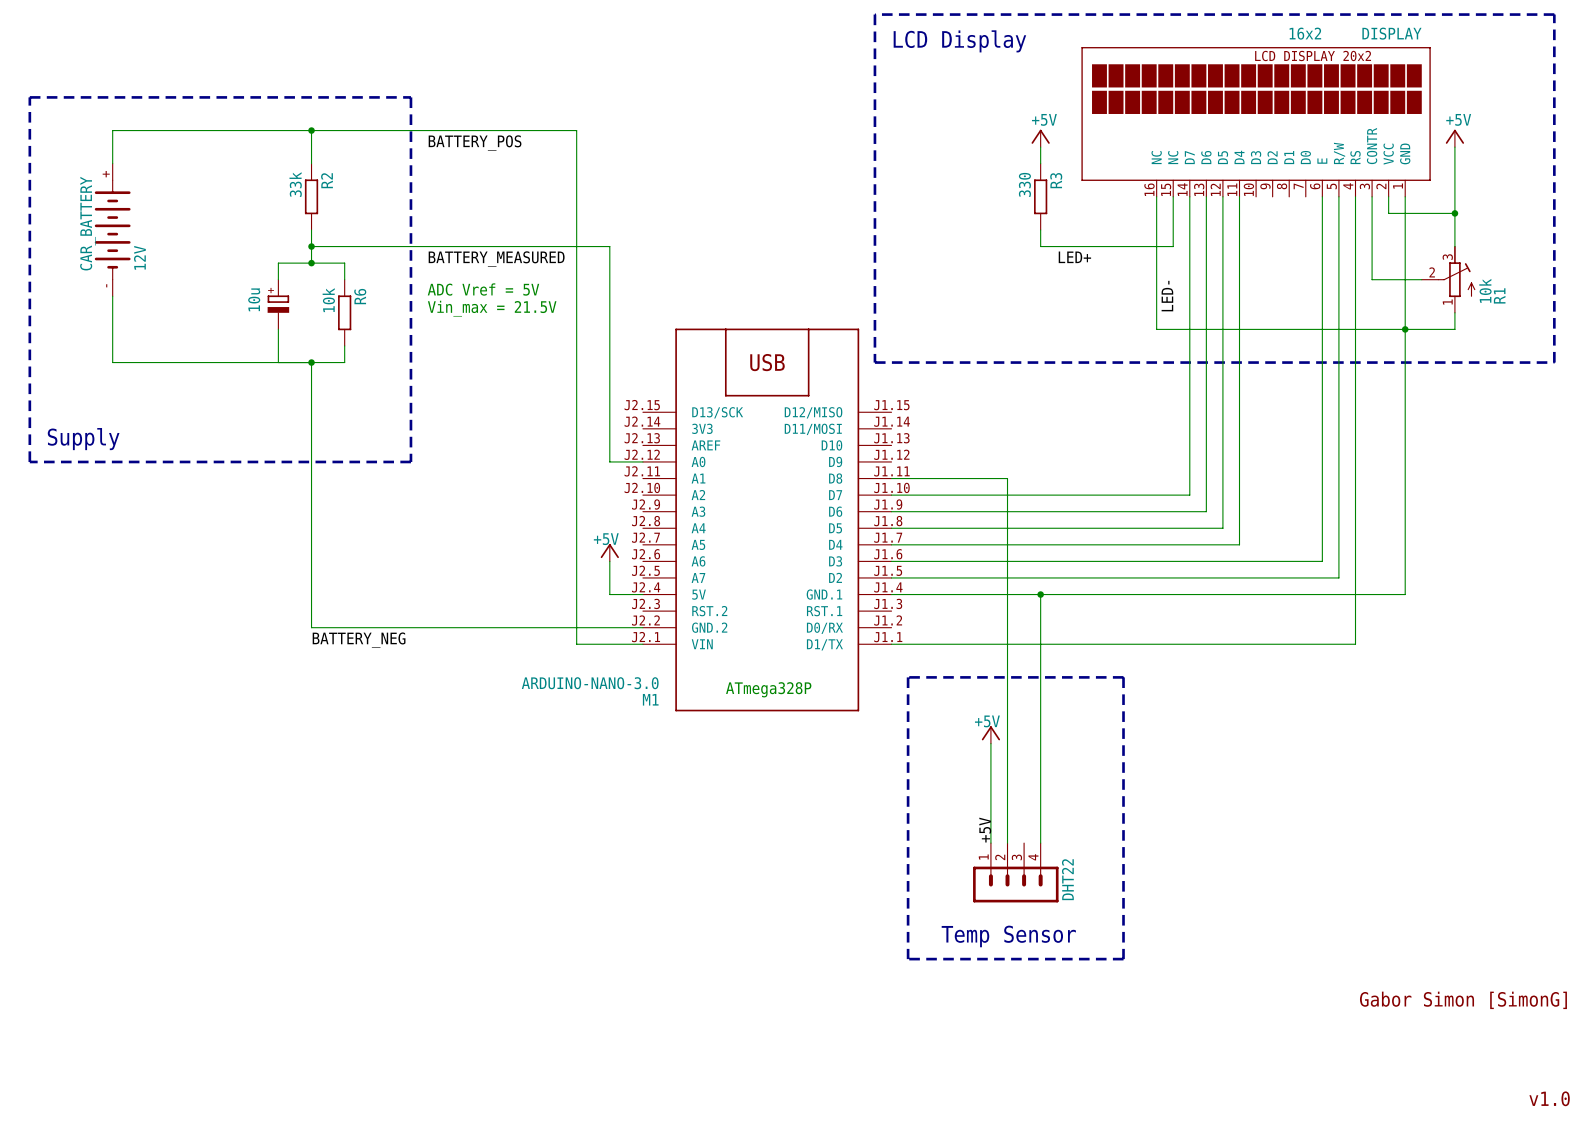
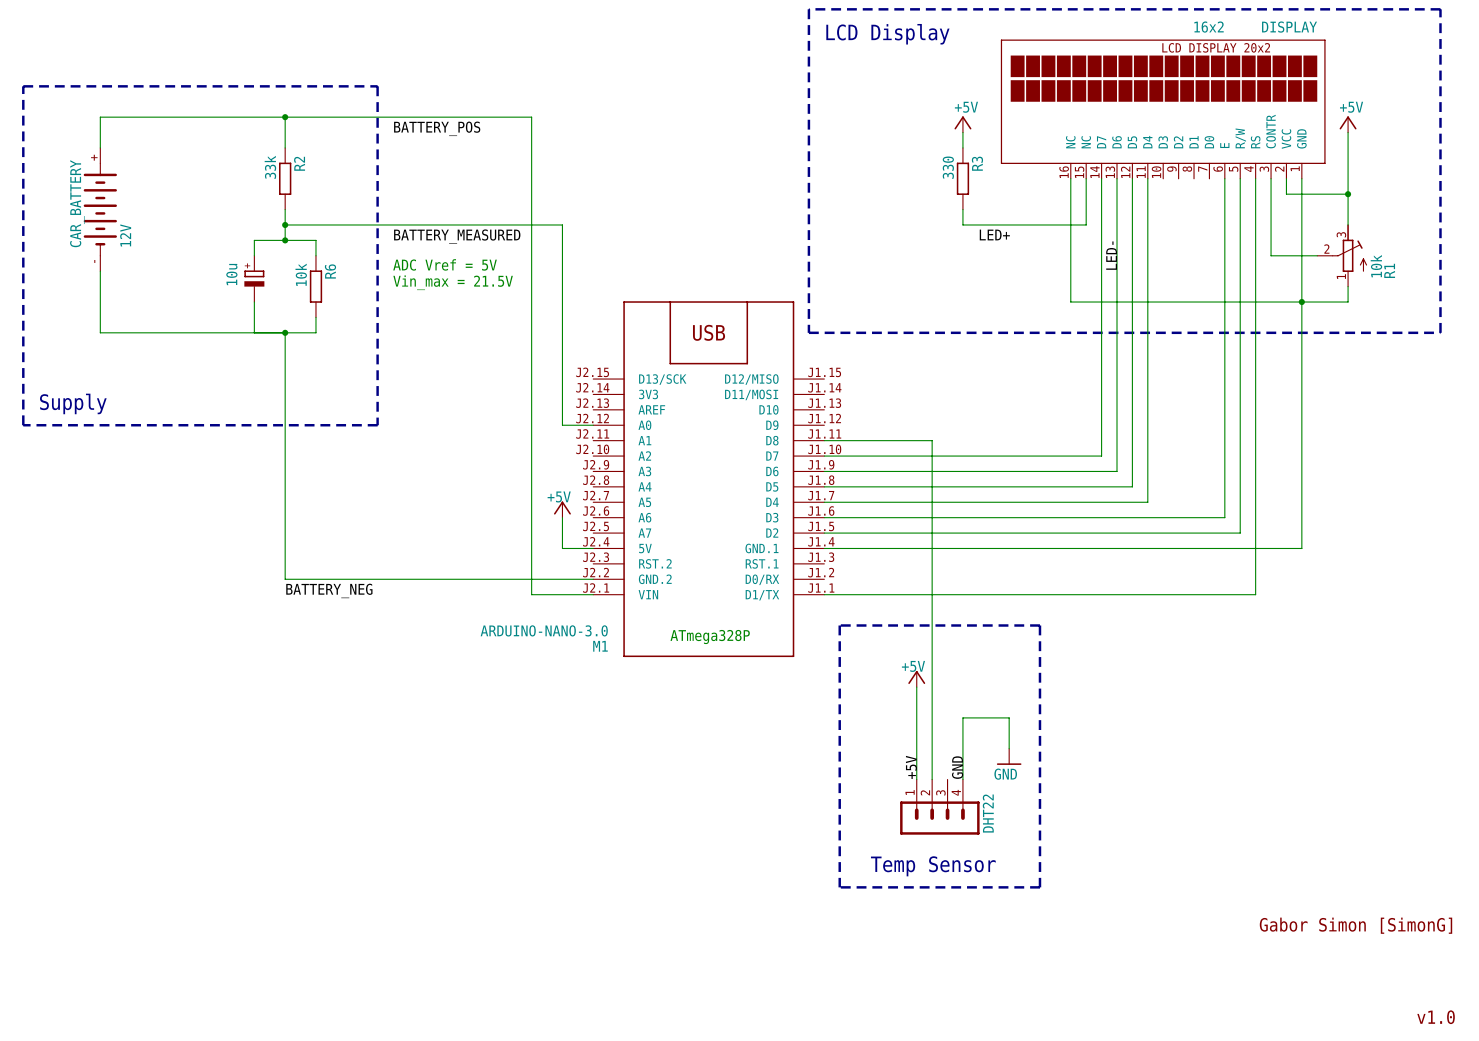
label position: LED- (1167, 296) -> LED- (1111, 255)
wire: (1040, 594) (1040, 776) -> (1009, 748) (1009, 717) (962, 717)
junction: (1040, 594) -> none
power symbol: none -> GND (1009, 756)
label: none -> GND (957, 767)

